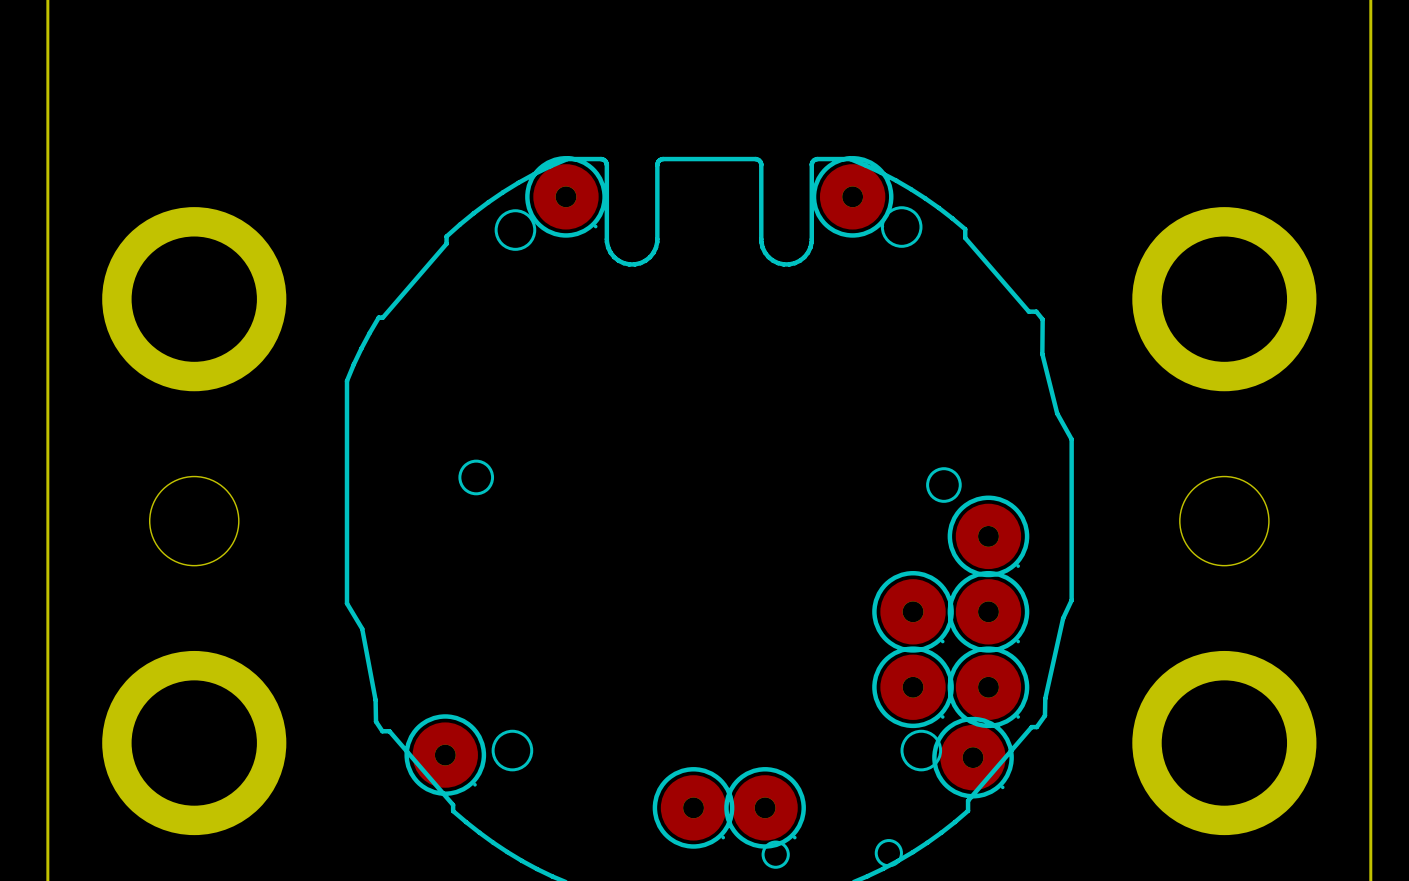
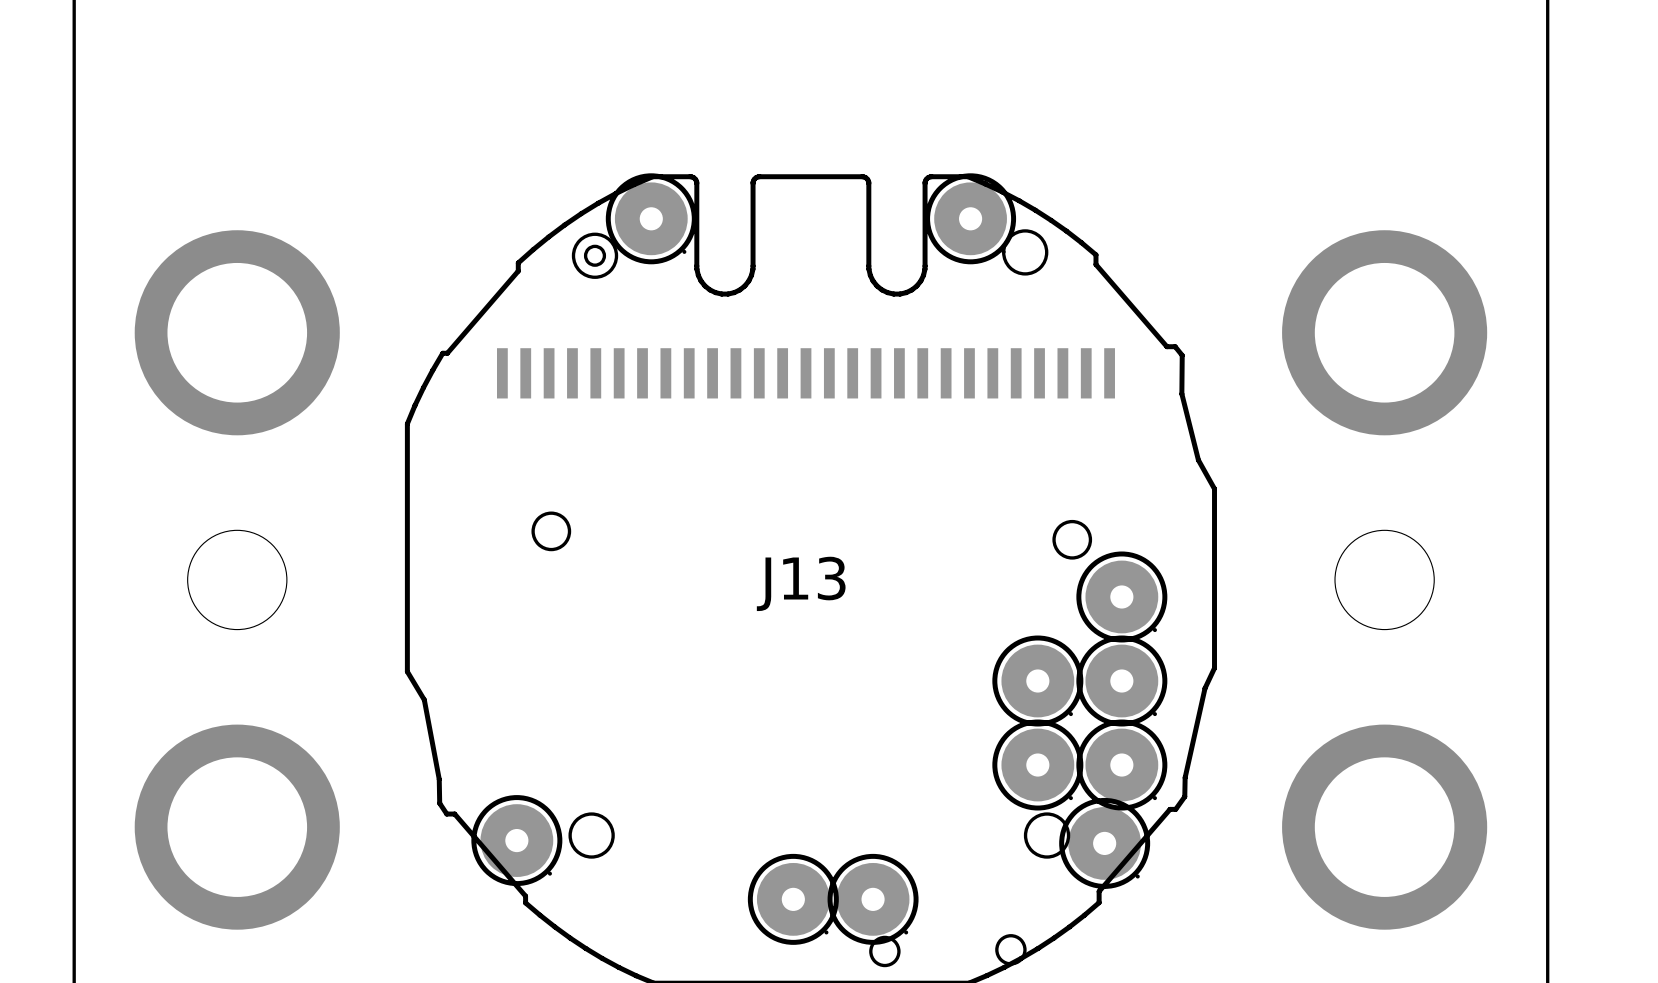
drawing: none -> [583, 244, 607, 267]
J13: none -> (805, 373)

